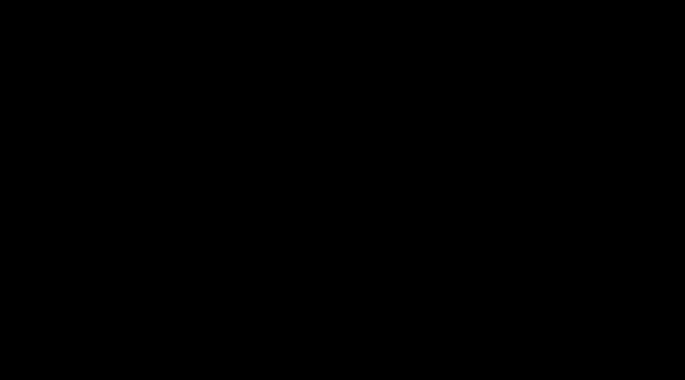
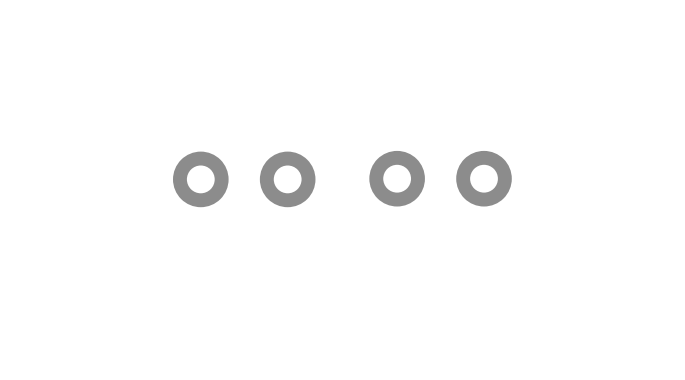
part: none -> (440, 178)
part: none -> (244, 179)

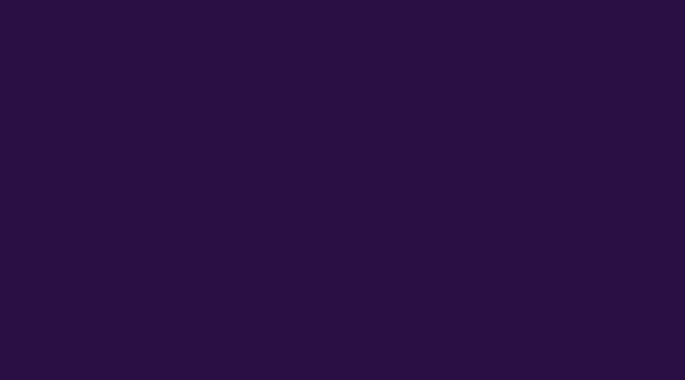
part: (440, 178) -> none
part: (244, 179) -> none

